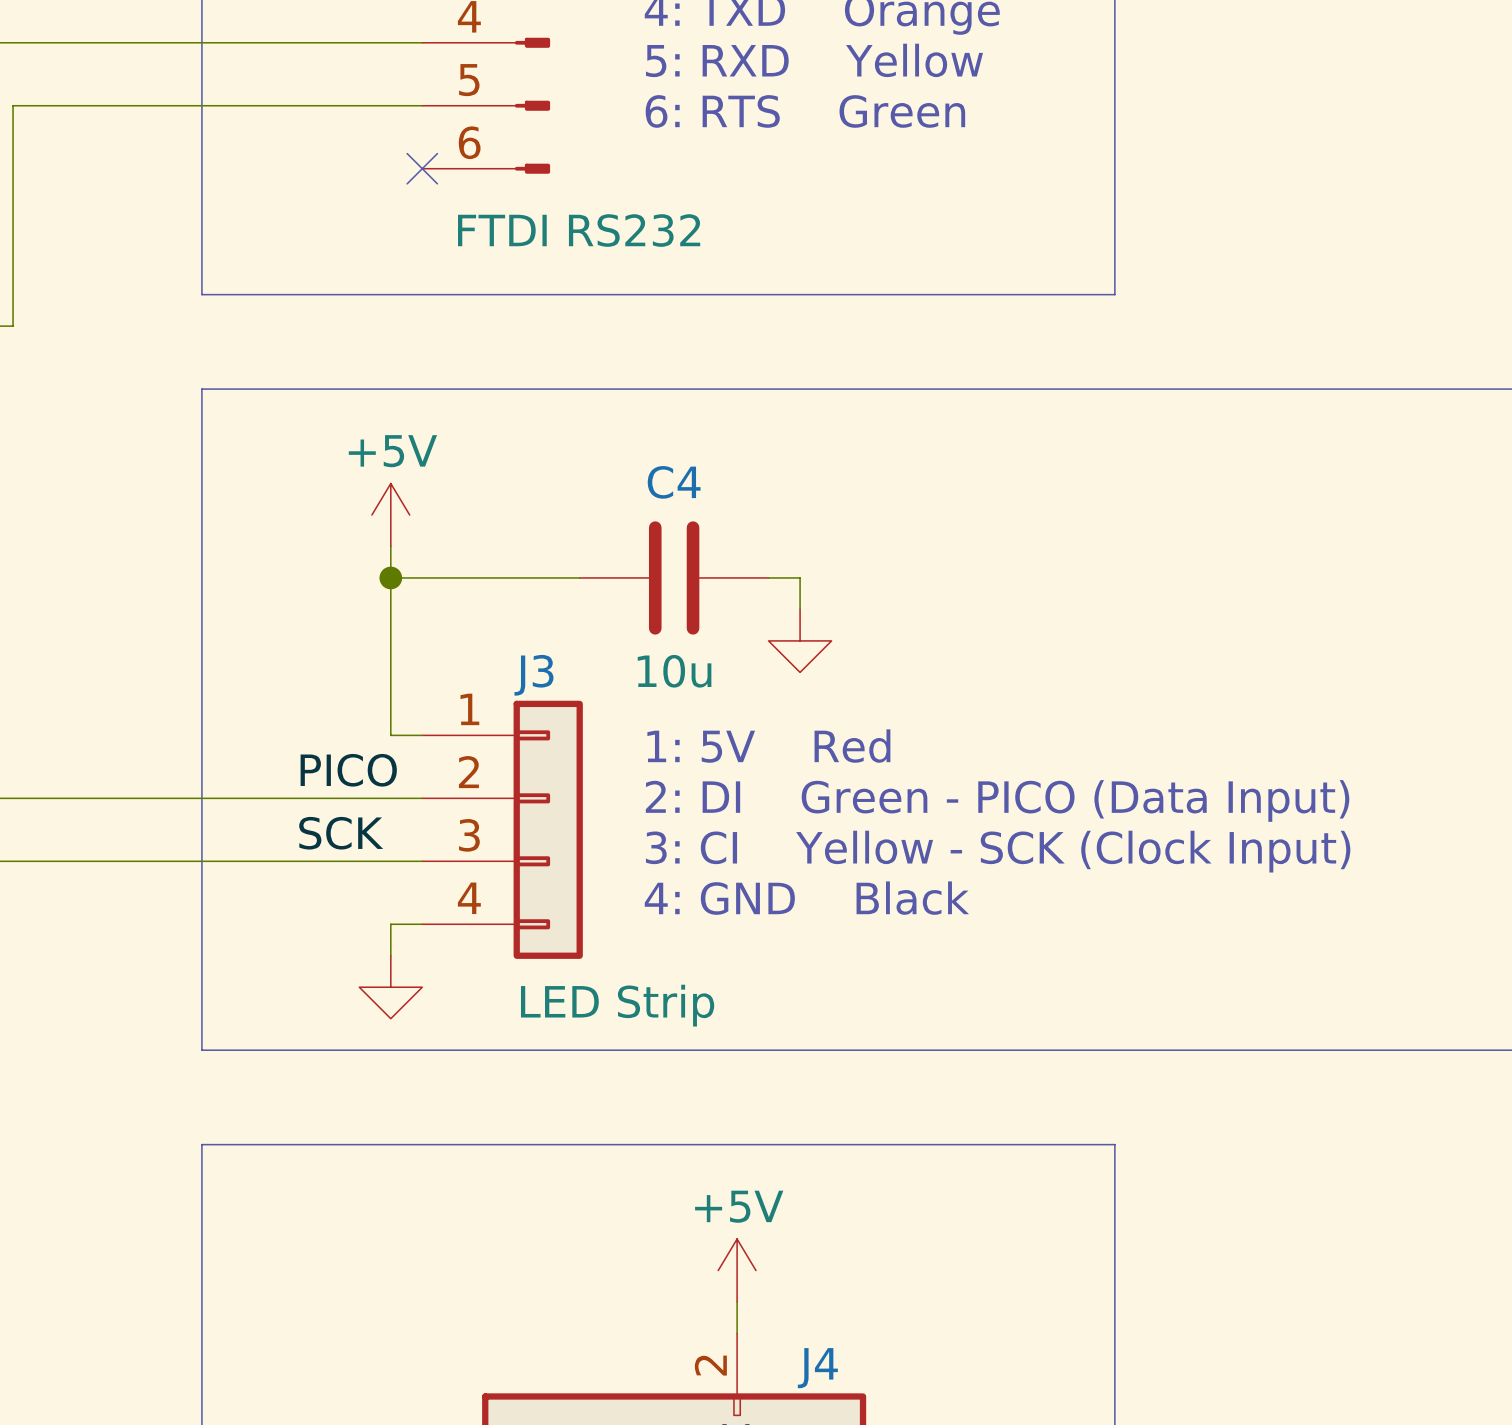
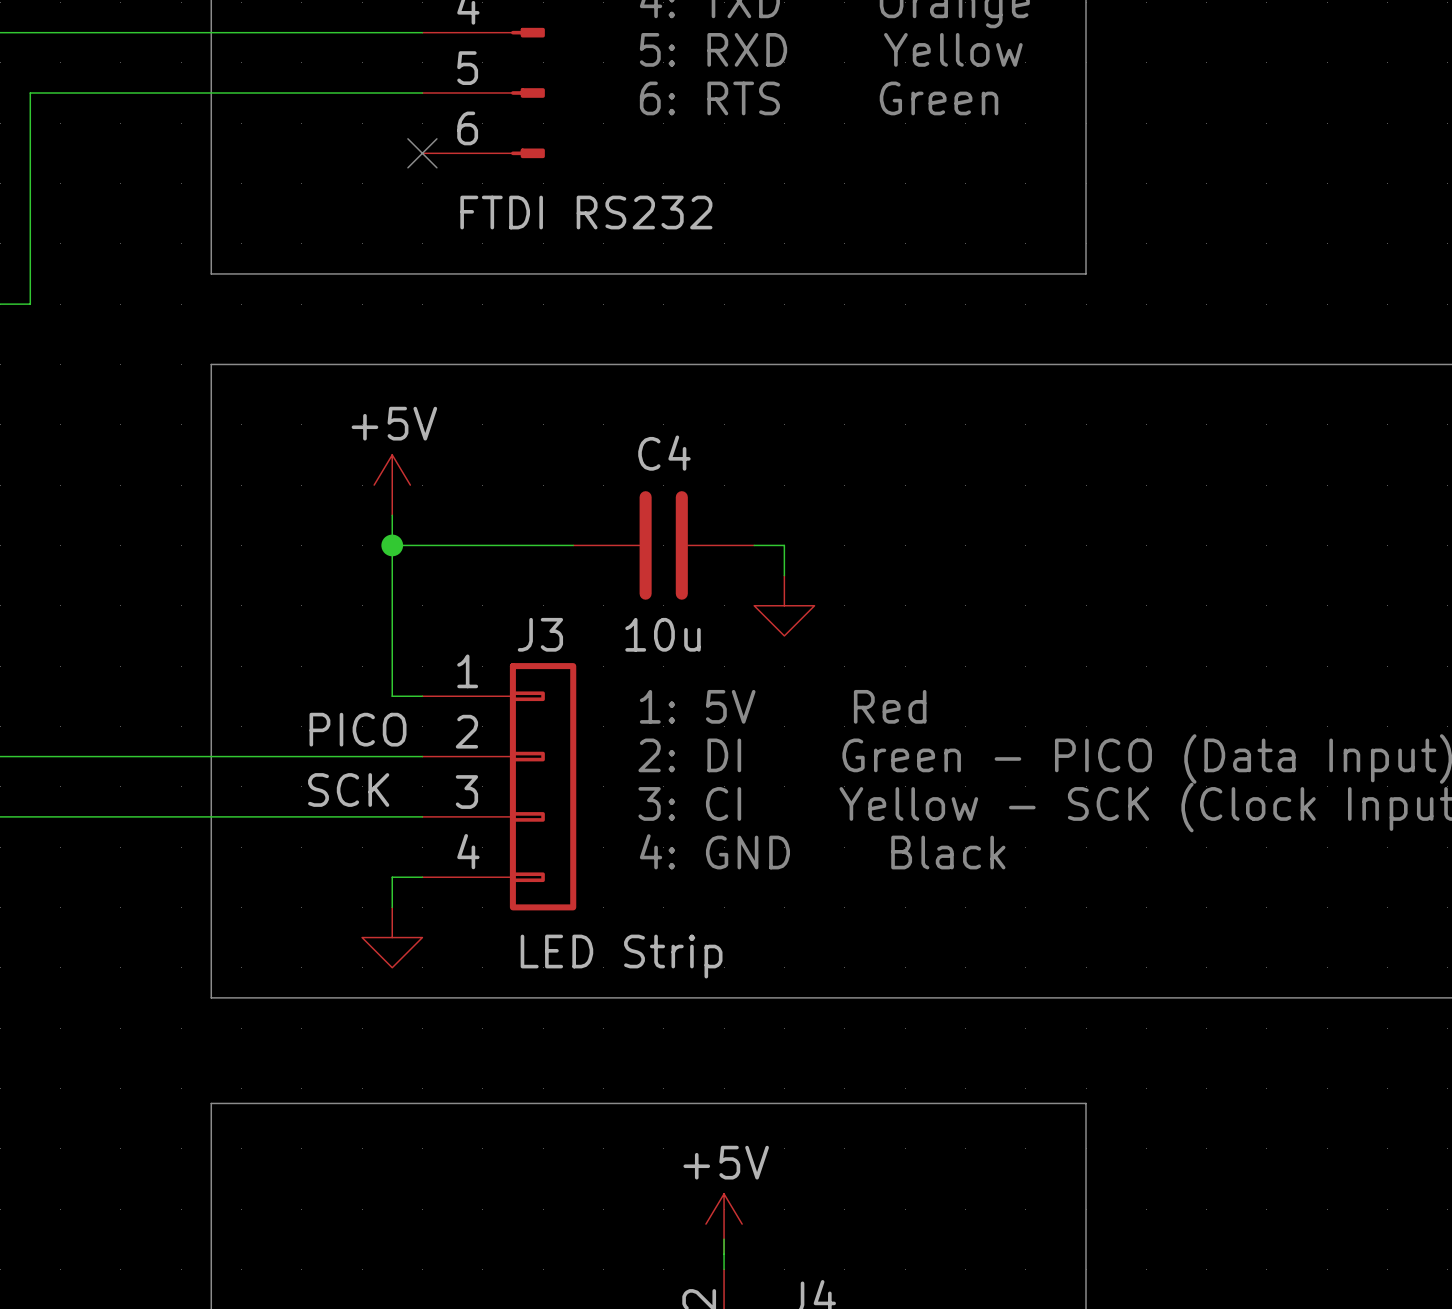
line: (201, 1160) (201, 1144) (1114, 1144) (1114, 1160) -> (211, 1103) (1086, 1103)
power symbol position: +5V (737, 1270) -> +5V (724, 1224)

